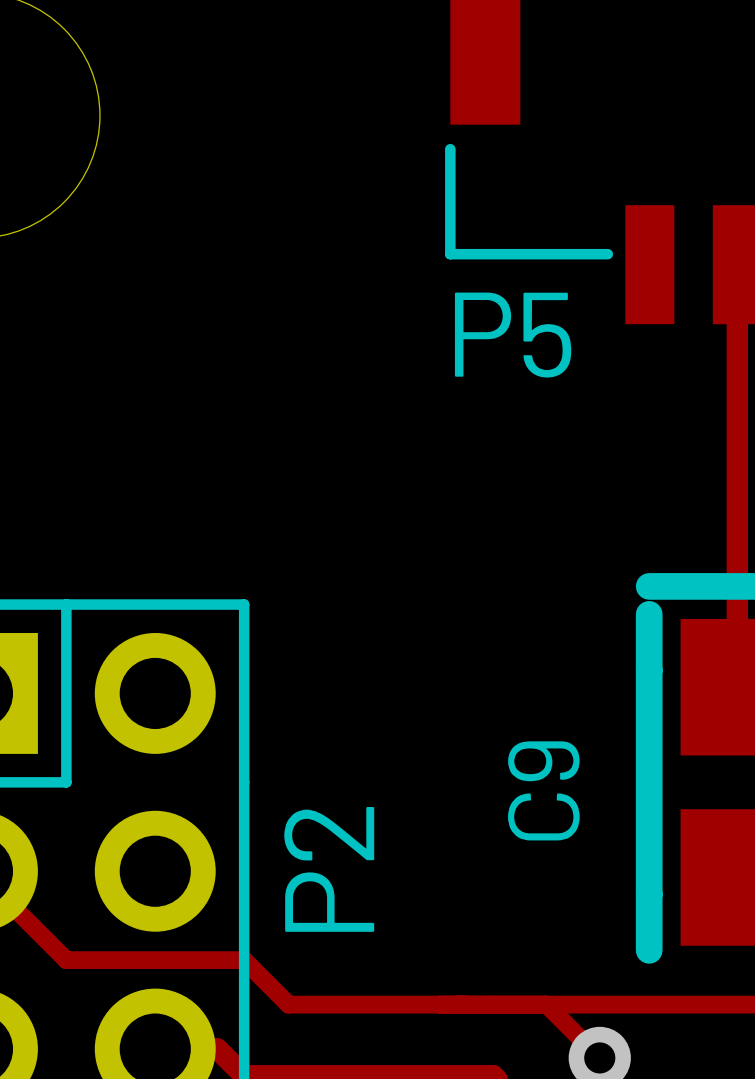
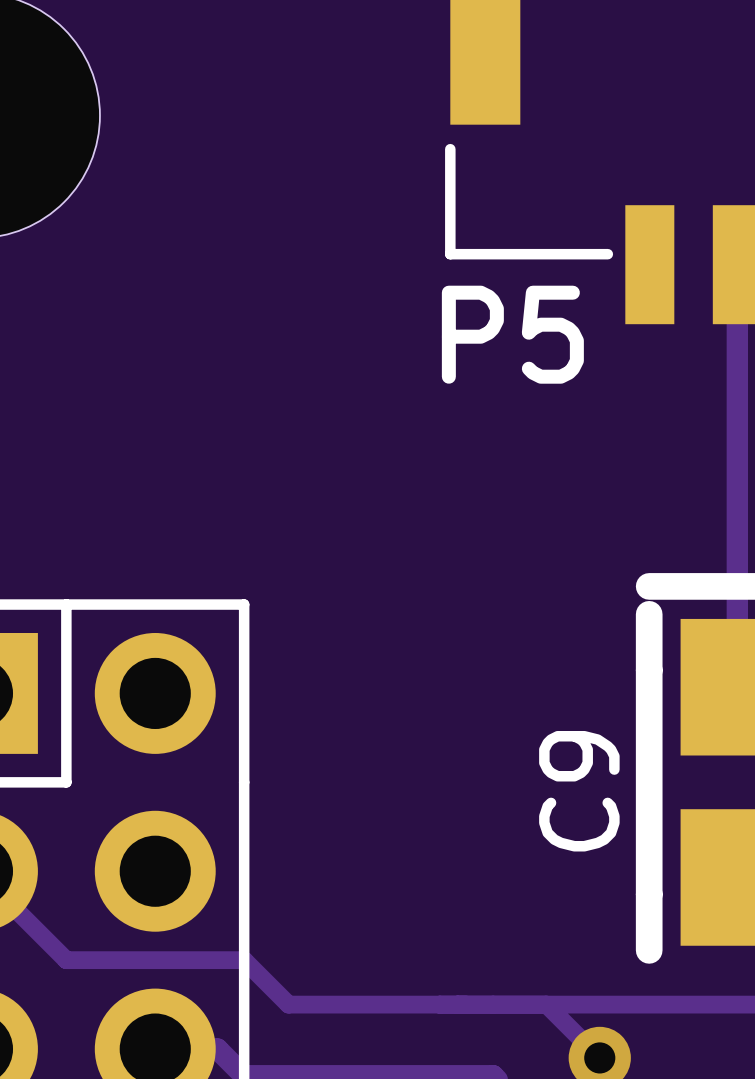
C9 name position: C9 (543, 790) -> C9 (579, 791)
P2 name: P2 (329, 869) -> none

